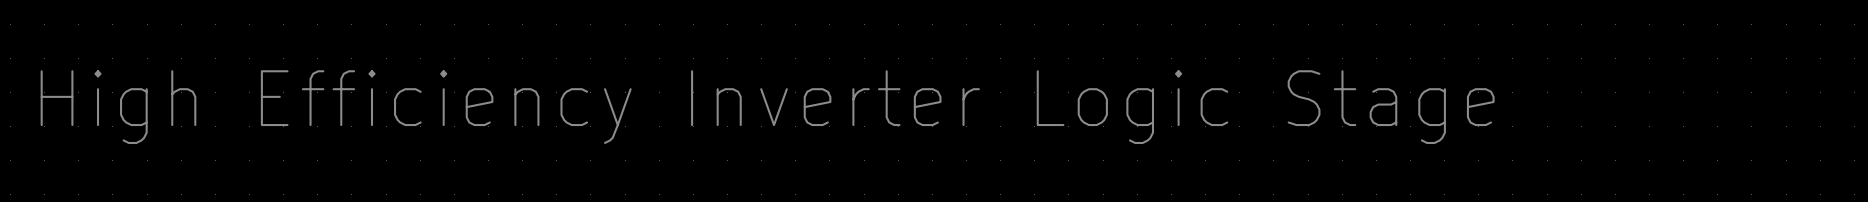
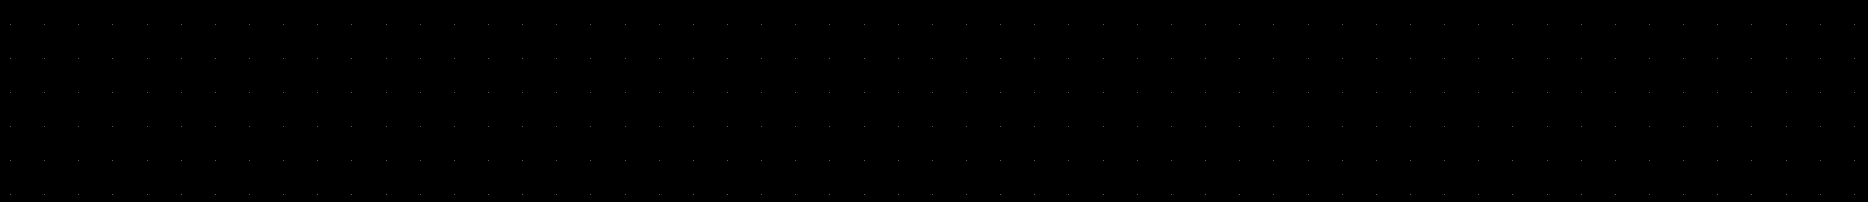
text: High Efficiency Inverter Logic Stage (767, 107) -> none

